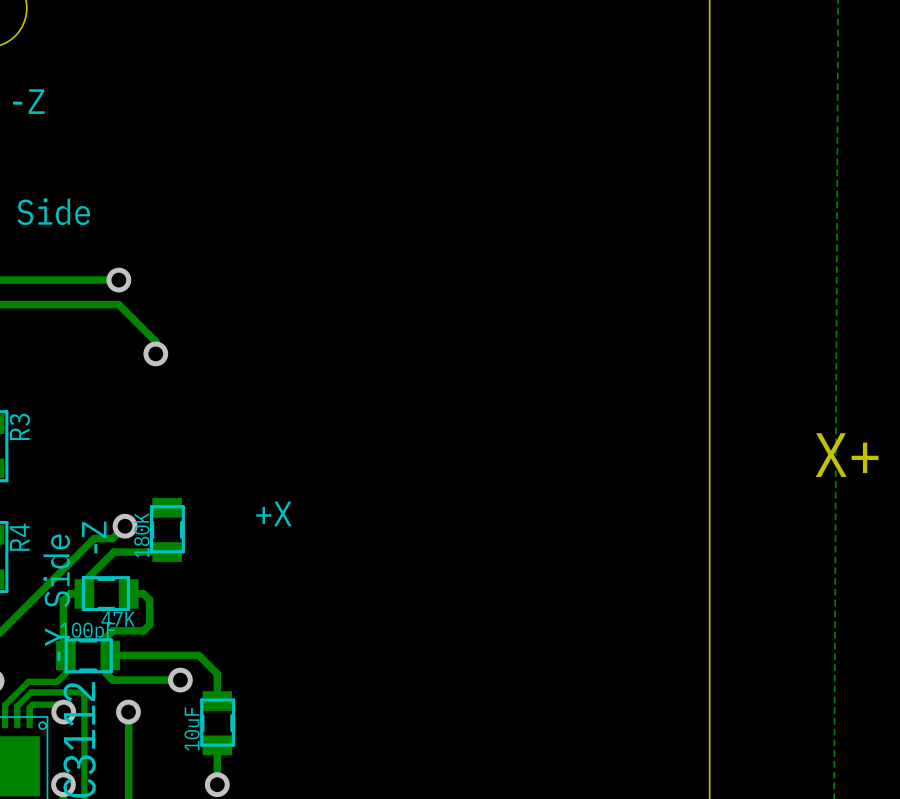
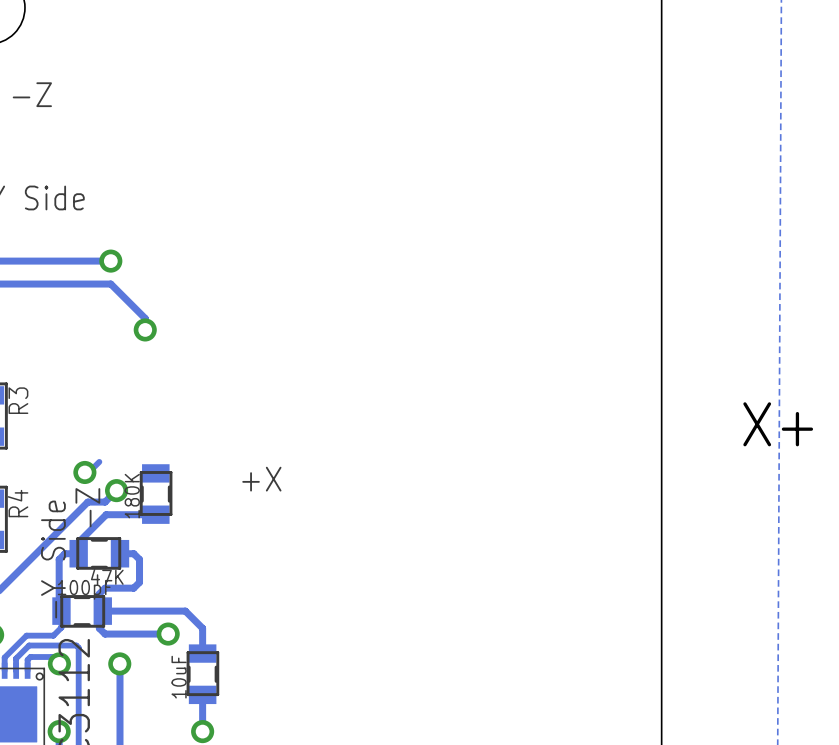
track: none -> (99, 461) (88, 472) (84, 472)
via: none -> (84, 472)

